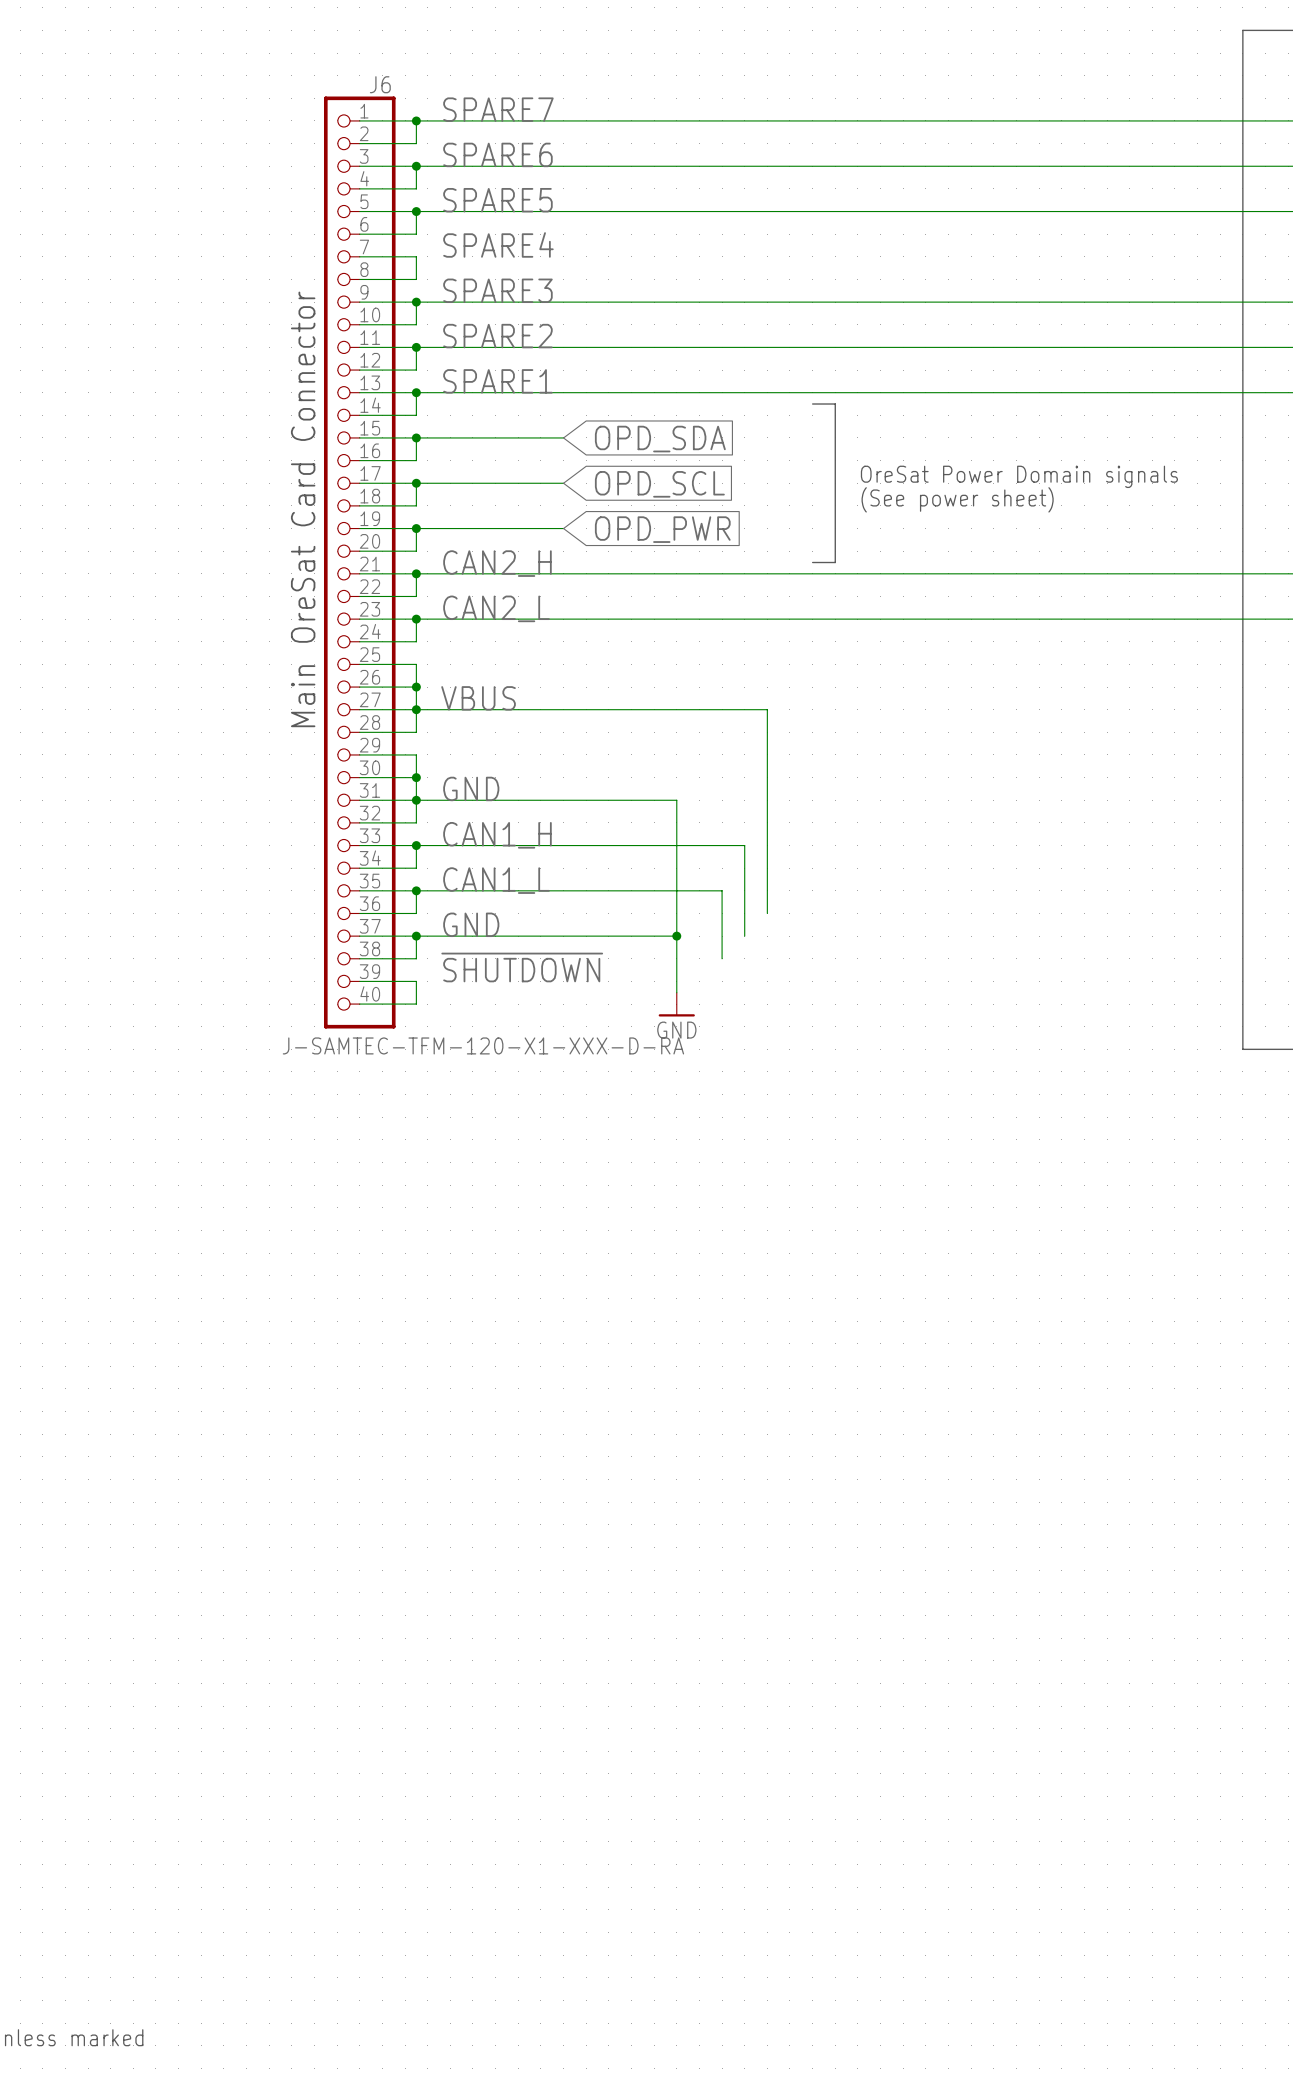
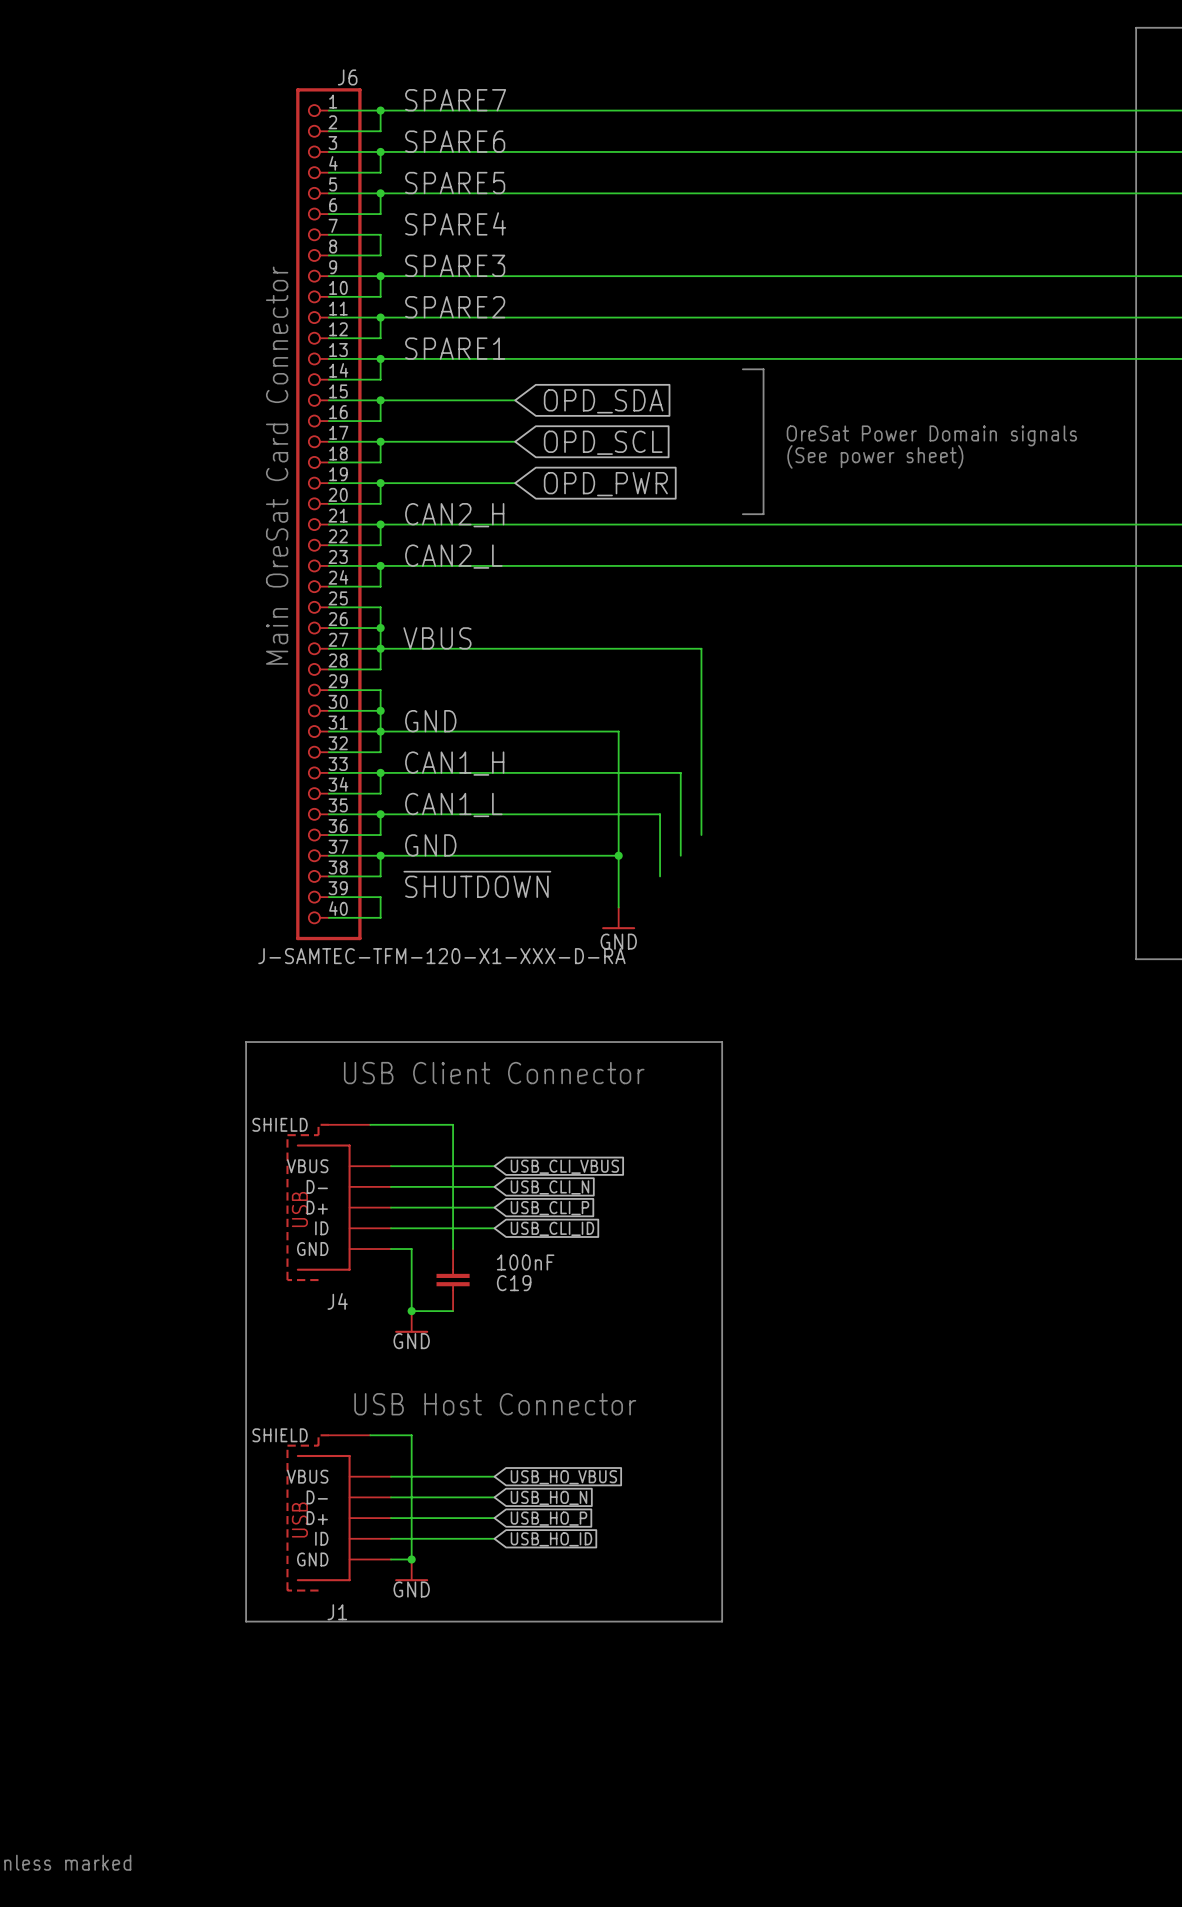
line: none -> (246, 1042) (246, 1621) (722, 1621) (722, 1042) (246, 1042)
text: none -> USB Client Connector (494, 1073)
wire: none -> (370, 1124) (453, 1124) (453, 1249)
wire: none -> (390, 1166) (494, 1166)
global label: none -> USB_CLI_VBUS (564, 1166)
wire: none -> (390, 1186) (494, 1186)
global label: none -> USB_CLI_N (549, 1187)
J4: none -> (338, 1202)
wire: none -> (390, 1207) (494, 1207)
global label: none -> USB_CLI_P (549, 1208)
wire: none -> (390, 1228) (494, 1228)
global label: none -> USB_CLI_ID (552, 1228)
wire: none -> (390, 1249) (411, 1249) (411, 1311) (453, 1311)
C19: none -> 100nF (453, 1280)
junction: none -> (411, 1311)
power symbol: none -> GND (411, 1321)
text: none -> USB Host Connector (495, 1404)
wire: none -> (370, 1435) (411, 1435) (411, 1559) (390, 1559)
wire: none -> (390, 1476) (494, 1476)
global label: none -> USB_HO_VBUS (563, 1477)
wire: none -> (390, 1497) (494, 1497)
global label: none -> USB_HO_N (548, 1497)
J1: none -> (338, 1512)
wire: none -> (390, 1518) (494, 1518)
global label: none -> USB_HO_P (548, 1518)
wire: none -> (390, 1538) (494, 1538)
global label: none -> USB_HO_ID (551, 1539)
junction: none -> (411, 1559)
power symbol: none -> GND (411, 1570)

